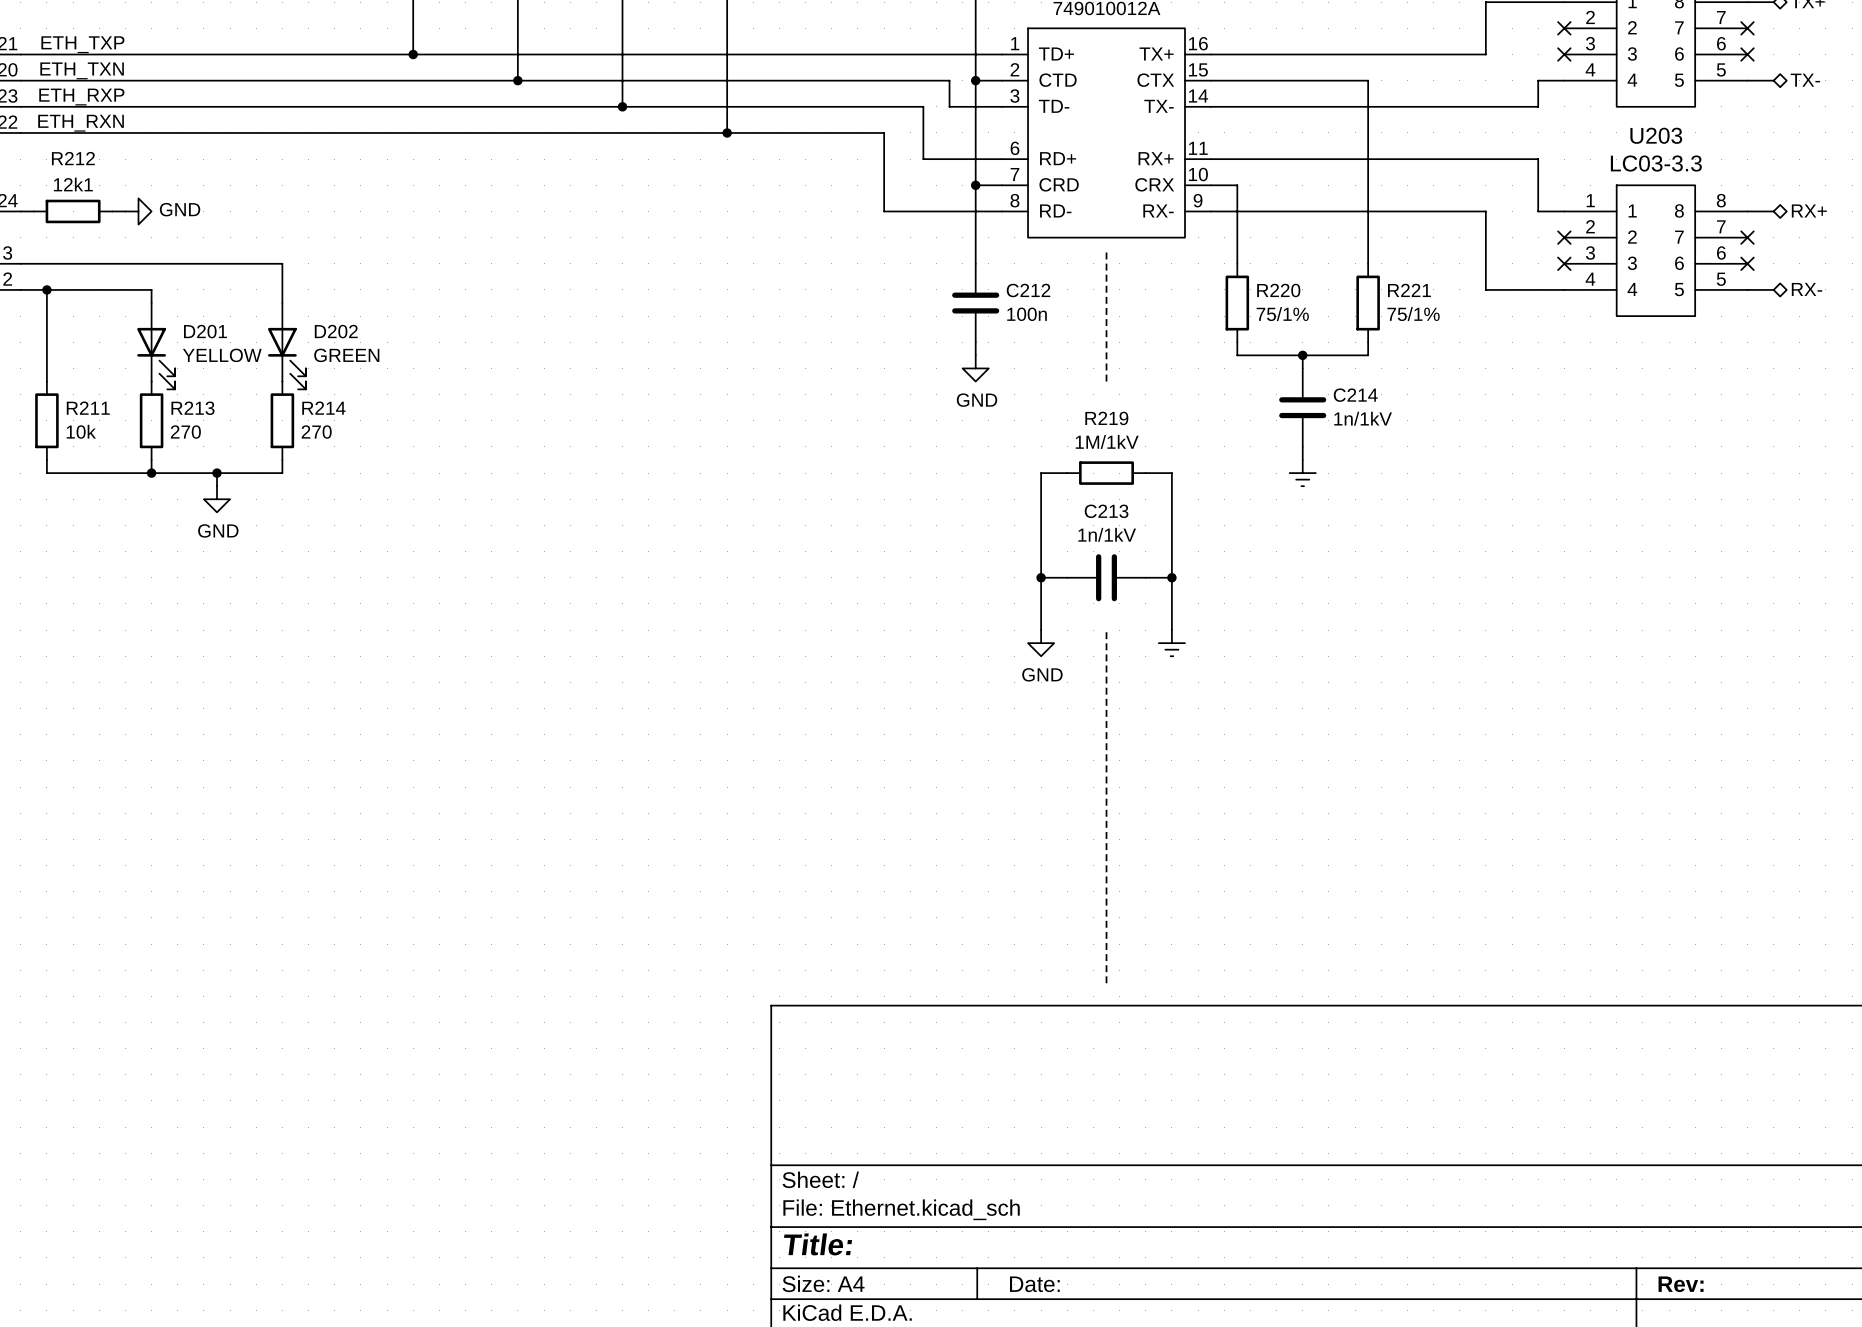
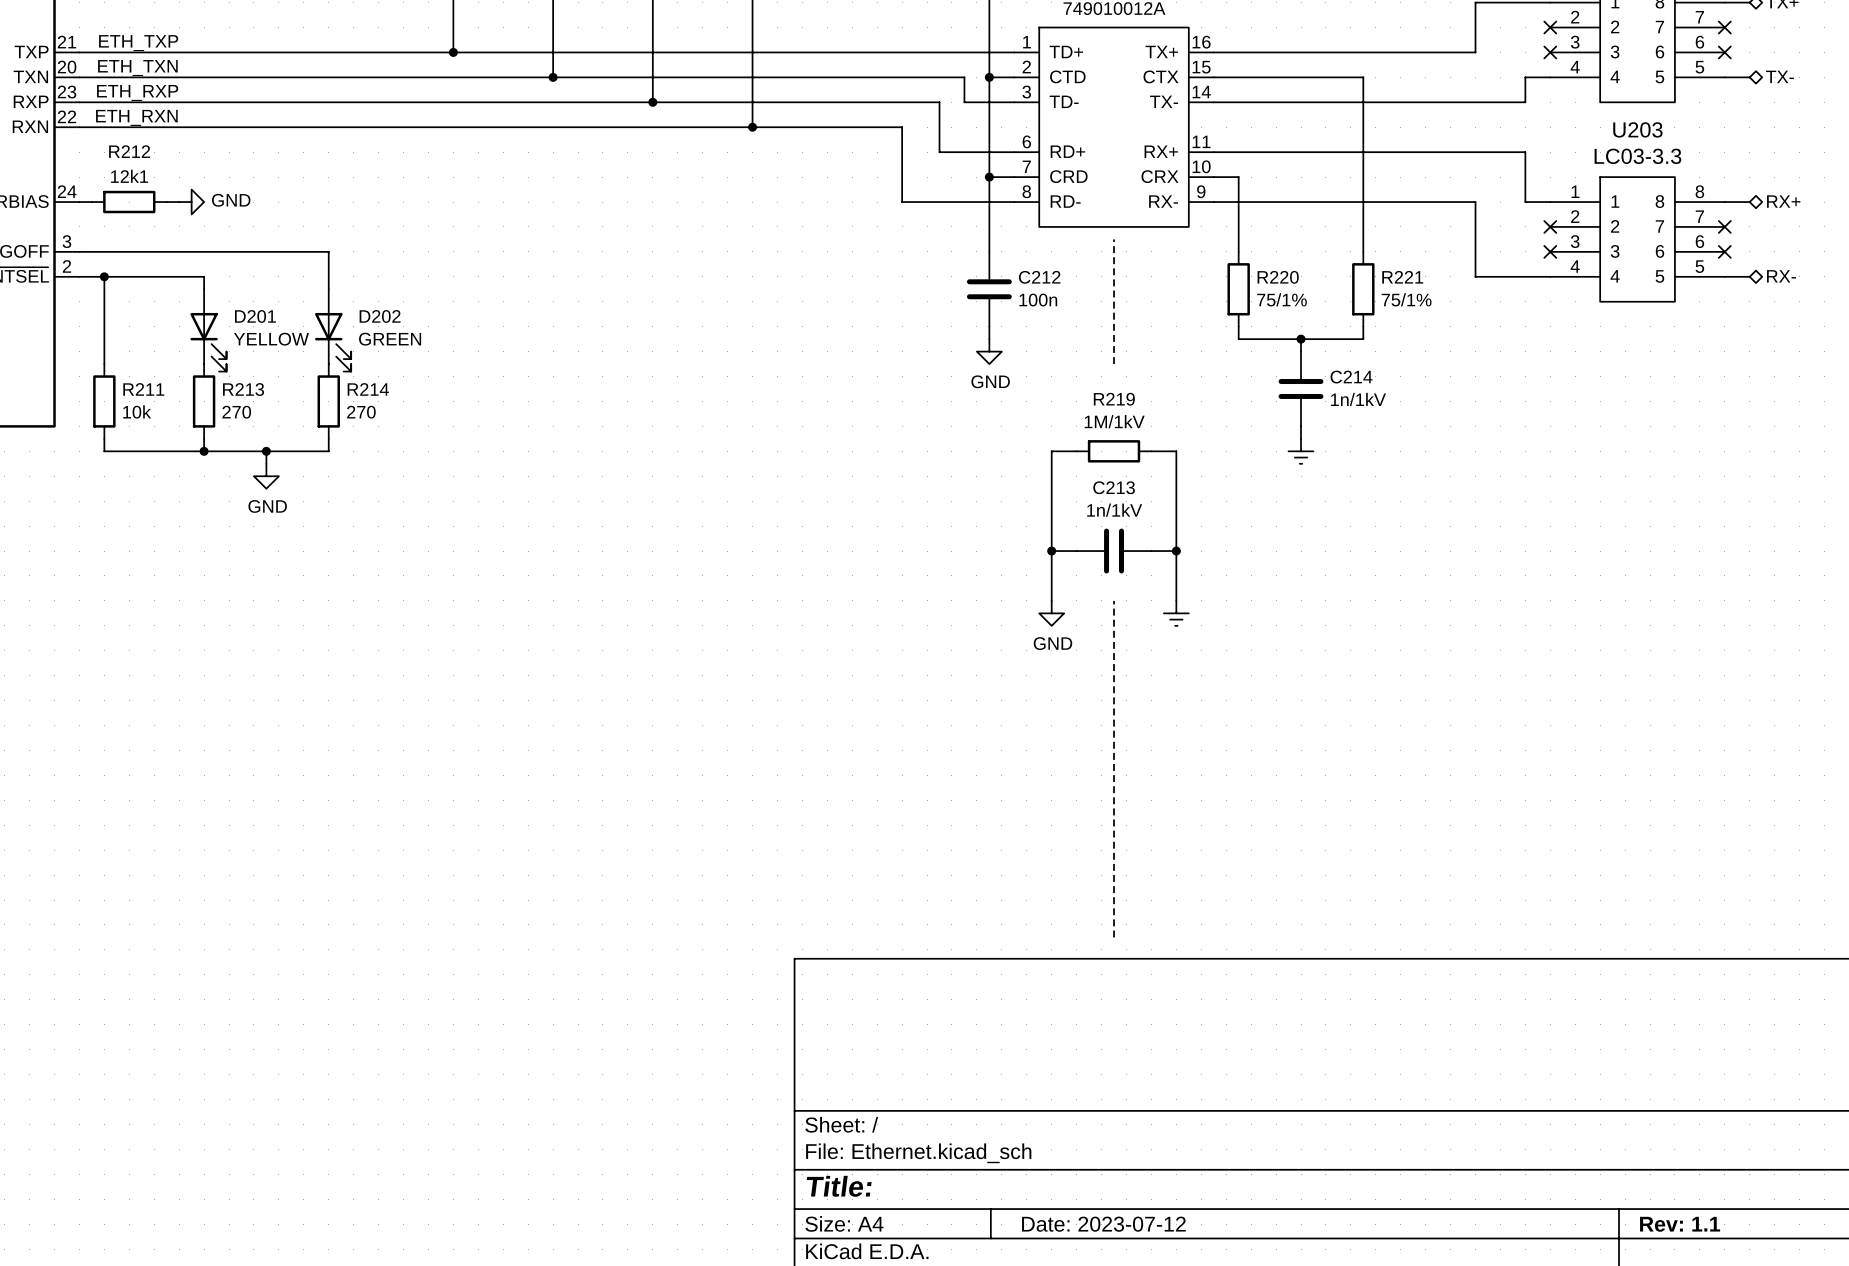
title block: Date: (1034, 1284) -> Date: 2023-07-12 (1103, 1224)
title block: Rev: (1681, 1284) -> Rev: 1.1 (1680, 1224)

